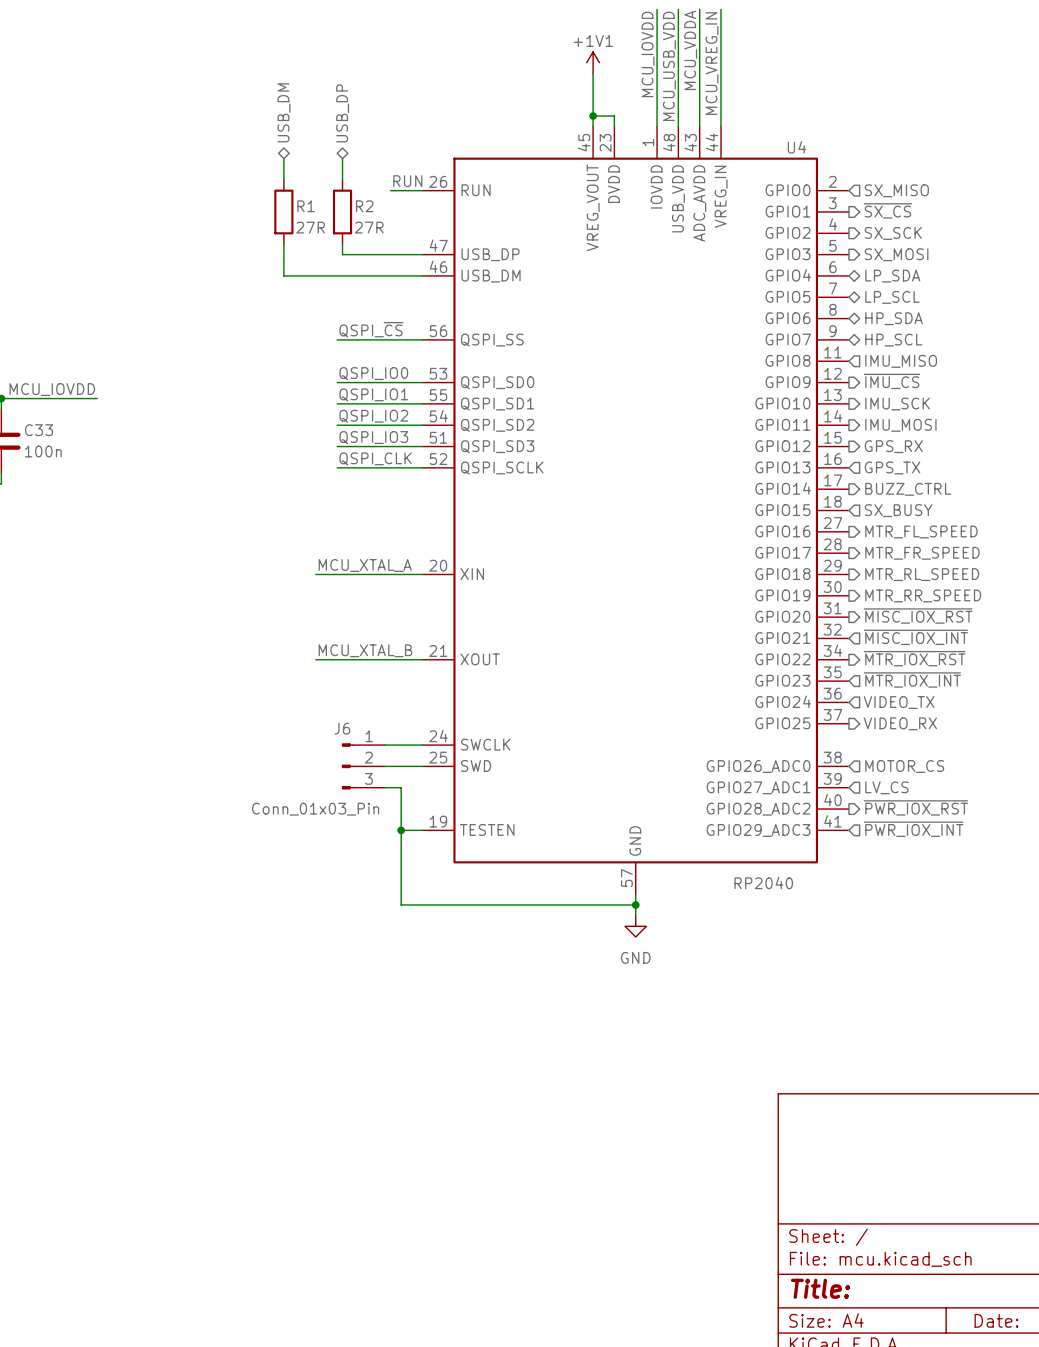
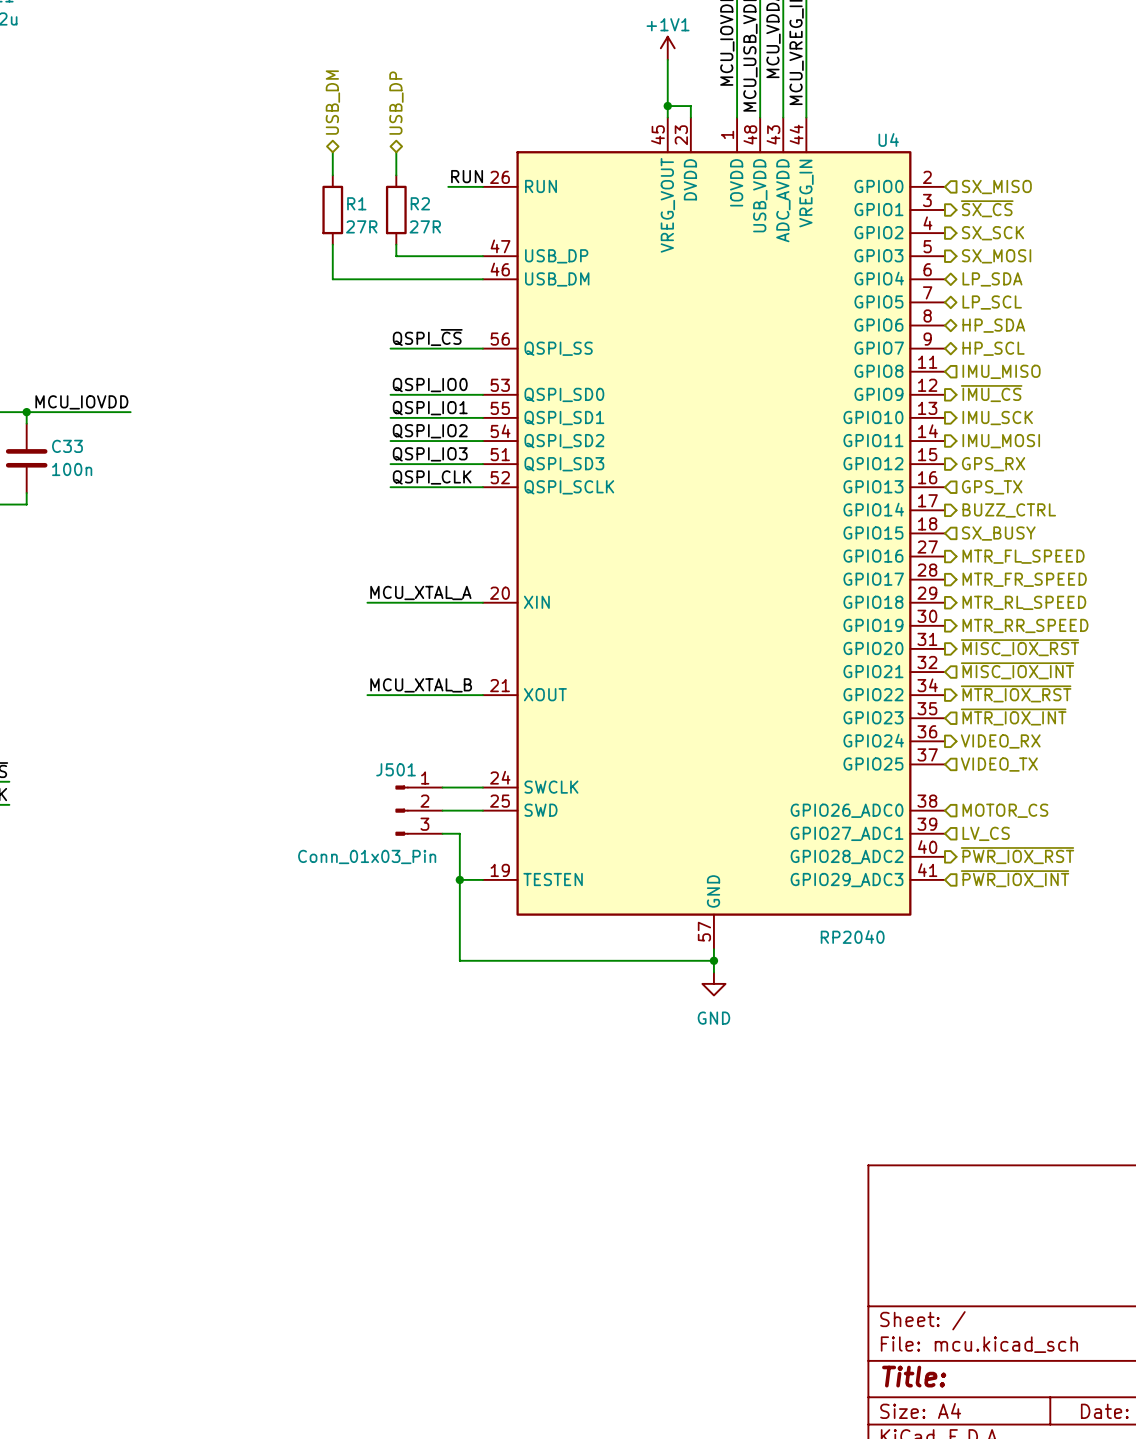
hierarchical label shape: input (899, 702) -> output (1000, 741)
hierarchical label: VIDEO_TX (899, 702) -> VIDEO_RX (1000, 741)
hierarchical label shape: output (900, 723) -> input (999, 764)
hierarchical label: VIDEO_RX (900, 723) -> VIDEO_TX (999, 764)
J6 name: J6 (342, 728) -> J501 (396, 769)

